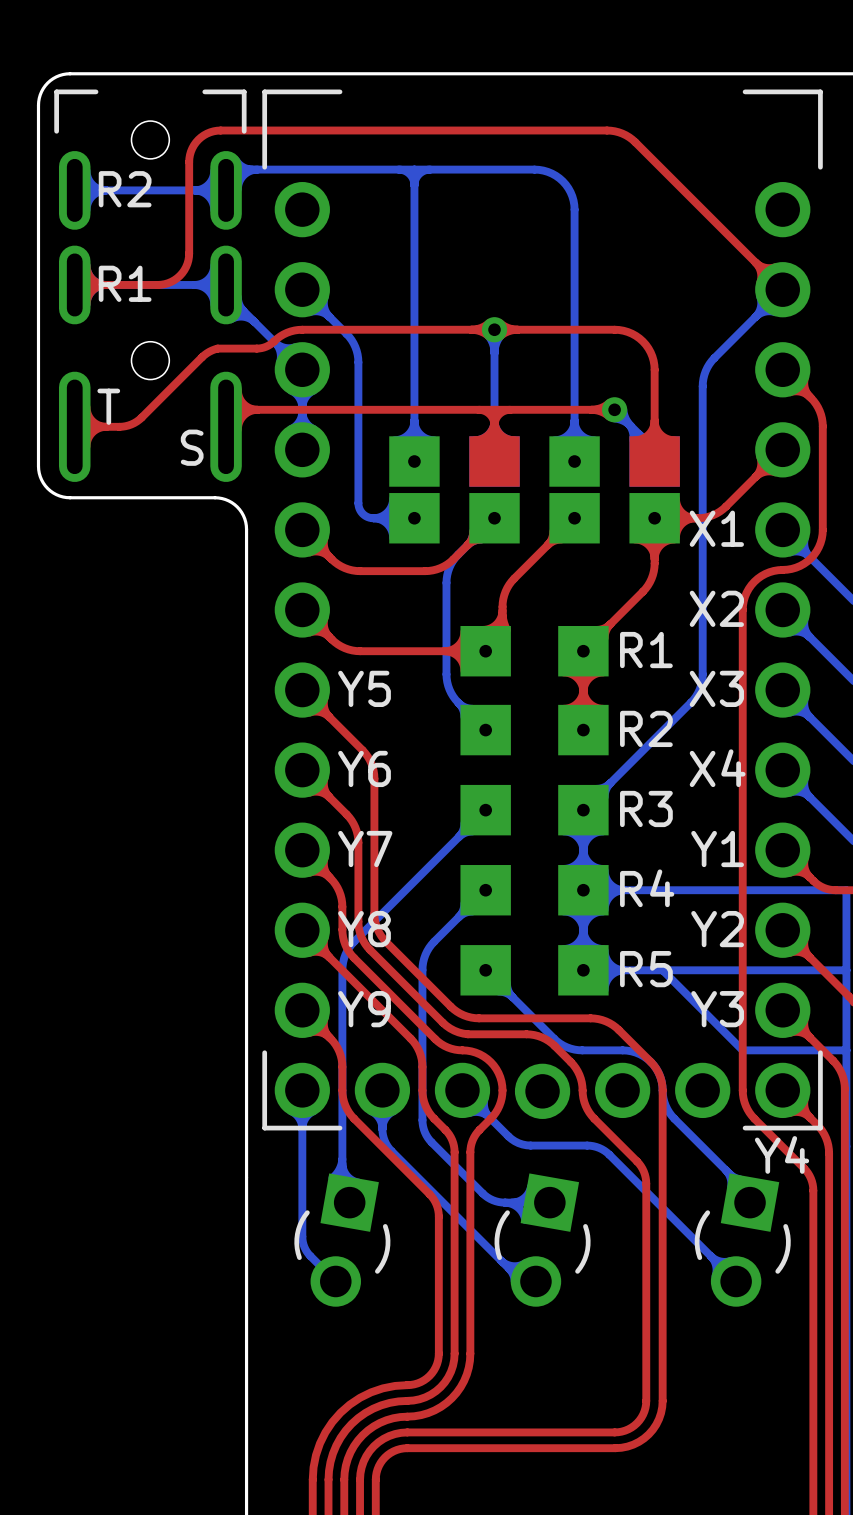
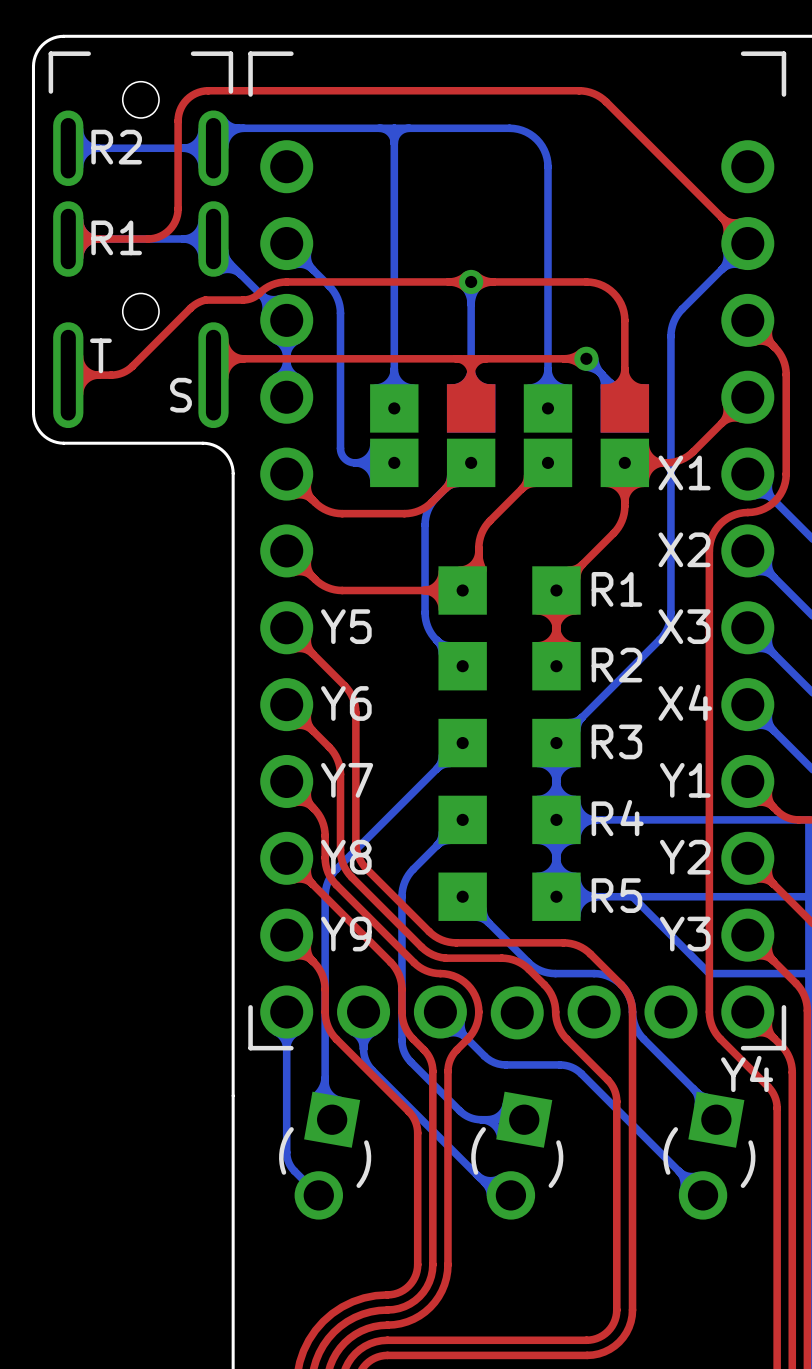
part footprint: [262, 89, 823, 1131] -> [248, 51, 787, 1051]

